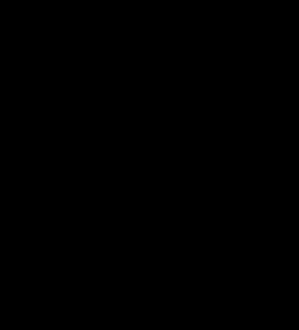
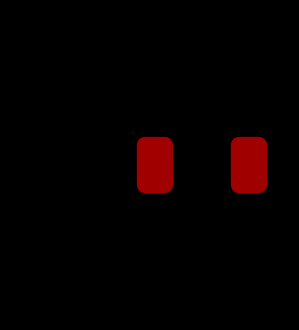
part: none -> (201, 164)

